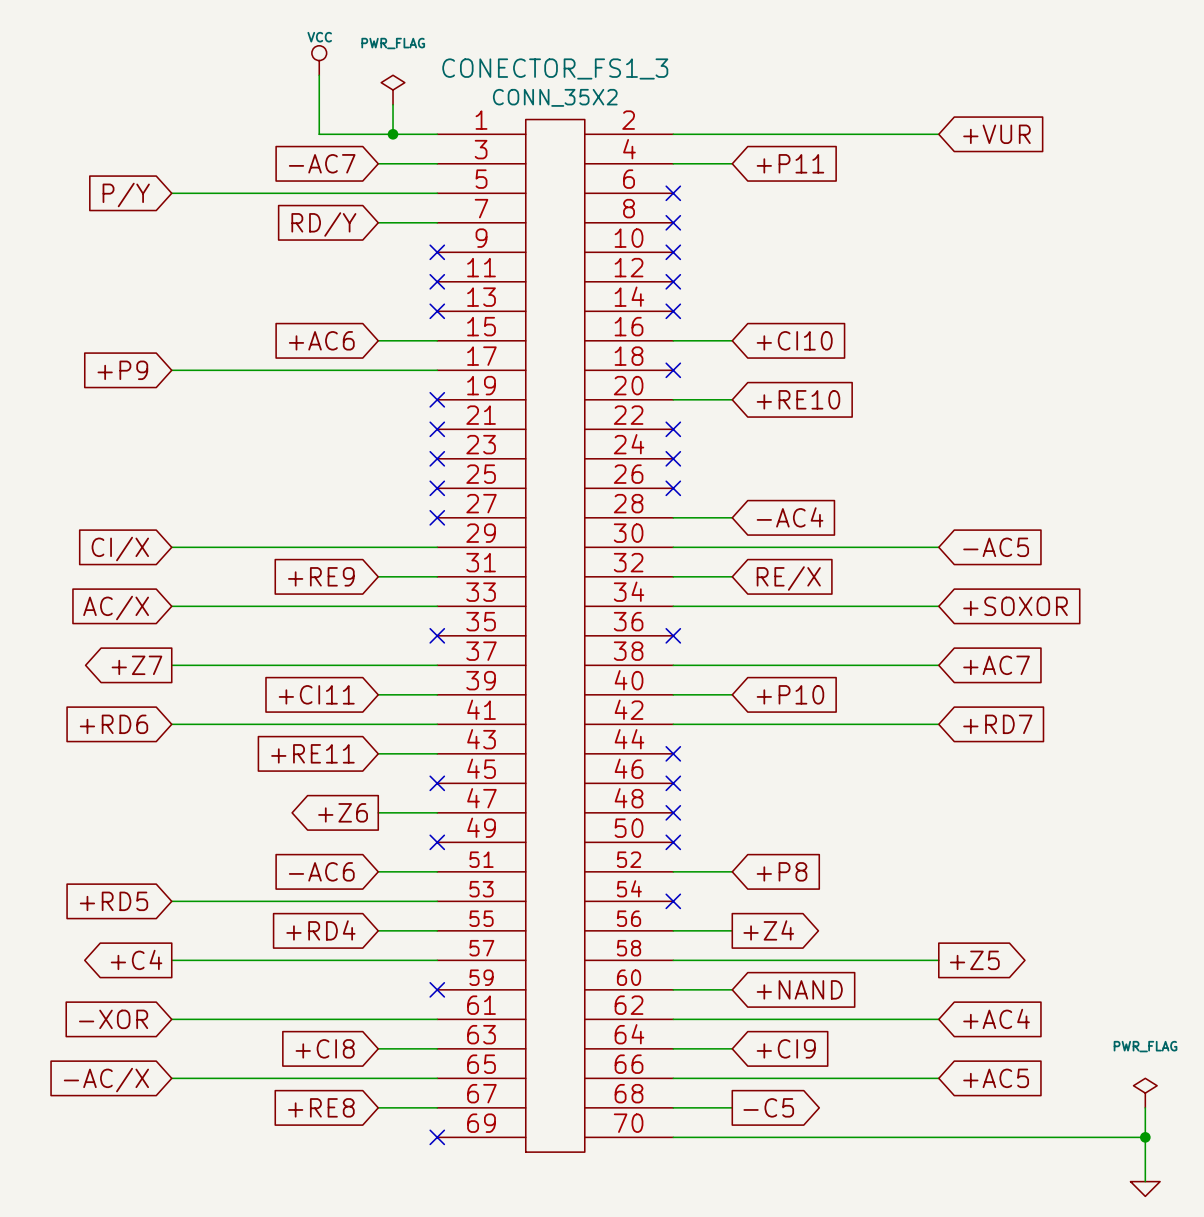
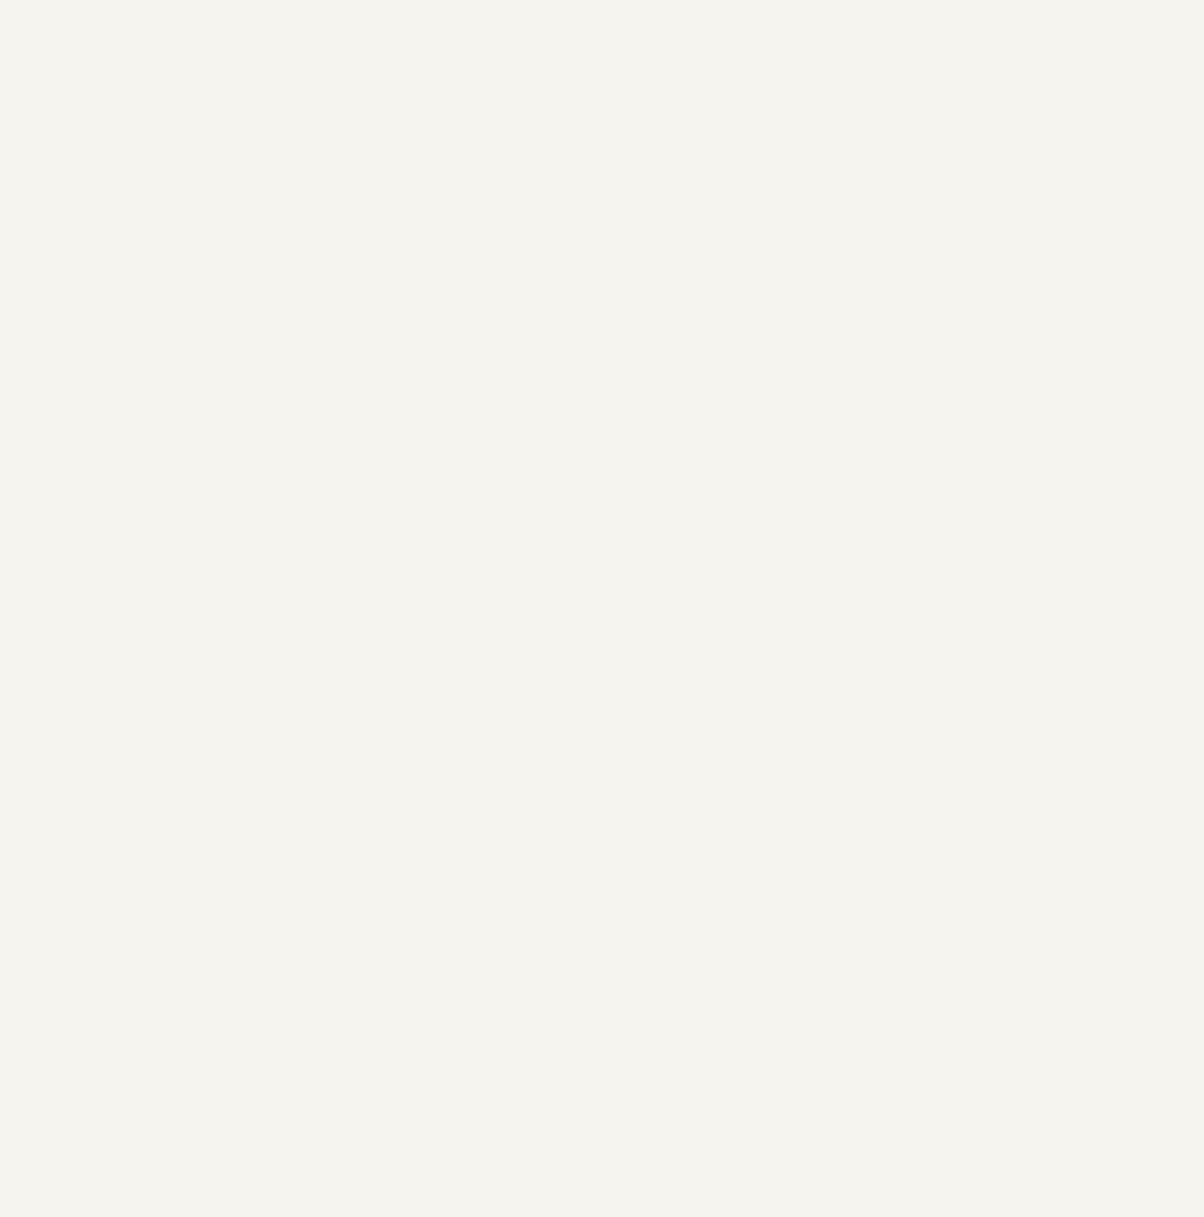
power symbol: VCC (319, 60) -> none
wire: (319, 75) (319, 134) (437, 134) -> none
power symbol: PWR_FLAG (393, 90) -> none
wire: (393, 104) (393, 134) -> none
junction: (393, 134) -> none
wire: (673, 134) (938, 134) -> none
global label: +VUR (996, 134) -> none
global label: -AC7 (322, 163) -> none
wire: (378, 163) (437, 163) -> none
wire: (673, 163) (732, 163) -> none
global label: +P11 (790, 163) -> none
wire: (171, 193) (437, 193) -> none
no-connect mark: (673, 193) -> none
global label: P/Y (126, 194) -> none
wire: (378, 222) (437, 222) -> none
no-connect mark: (673, 222) -> none
global label: RD/Y (323, 224) -> none
no-connect mark: (437, 252) -> none
no-connect mark: (673, 252) -> none
no-connect mark: (437, 281) -> none
no-connect mark: (673, 281) -> none
no-connect mark: (437, 311) -> none
no-connect mark: (673, 311) -> none
global label: +AC6 (321, 340) -> none
wire: (378, 340) (437, 340) -> none
wire: (673, 340) (732, 340) -> none
global label: +CI10 (794, 340) -> none
global label: +P9 (122, 370) -> none
wire: (171, 370) (437, 370) -> none
no-connect mark: (673, 370) -> none
no-connect mark: (437, 399) -> none
wire: (673, 399) (732, 399) -> none
global label: +RE10 (798, 399) -> none
no-connect mark: (437, 429) -> none
no-connect mark: (673, 429) -> none
no-connect mark: (437, 458) -> none
no-connect mark: (673, 458) -> none
no-connect mark: (437, 488) -> none
no-connect mark: (673, 488) -> none
no-connect mark: (437, 517) -> none
wire: (673, 517) (732, 517) -> none
global label: -AC4 (790, 517) -> none
wire: (171, 547) (437, 547) -> none
wire: (673, 547) (938, 547) -> none
global label: -AC5 (996, 547) -> none
global label: CI/X (120, 549) -> none
global label: +RE9 (321, 576) -> none
wire: (378, 576) (437, 576) -> none
wire: (673, 576) (732, 576) -> none
global label: RE/X (788, 578) -> none
wire: (171, 606) (437, 606) -> none
wire: (673, 606) (938, 606) -> none
global label: +SOXOR (1015, 606) -> none
global label: AC/X (116, 608) -> none
no-connect mark: (437, 635) -> none
CONECTOR_FS1_3: CONN_35X2 (555, 635) -> none
no-connect mark: (673, 635) -> none
global label: +Z7 (136, 665) -> none
wire: (171, 665) (437, 665) -> none
wire: (673, 665) (938, 665) -> none
global label: +AC7 (996, 665) -> none
global label: +CI11 (316, 694) -> none
wire: (378, 694) (437, 694) -> none
wire: (673, 694) (732, 694) -> none
global label: +P10 (790, 694) -> none
global label: +RD6 (114, 724) -> none
wire: (171, 724) (437, 724) -> none
wire: (673, 724) (938, 724) -> none
global label: +RD7 (997, 724) -> none
global label: +RE11 (312, 753) -> none
wire: (378, 753) (437, 753) -> none
no-connect mark: (673, 753) -> none
no-connect mark: (437, 783) -> none
no-connect mark: (673, 783) -> none
global label: +Z6 (343, 812) -> none
wire: (378, 812) (437, 812) -> none
no-connect mark: (673, 812) -> none
no-connect mark: (437, 842) -> none
no-connect mark: (673, 842) -> none
global label: -AC6 (321, 871) -> none
wire: (378, 871) (437, 871) -> none
wire: (673, 871) (732, 871) -> none
global label: +P8 (782, 871) -> none
global label: +RD5 (114, 901) -> none
wire: (171, 901) (437, 901) -> none
no-connect mark: (673, 901) -> none
global label: +RD4 (320, 930) -> none
wire: (378, 930) (437, 930) -> none
wire: (673, 930) (732, 930) -> none
global label: +Z4 (768, 930) -> none
global label: +C4 (136, 959) -> none
wire: (171, 960) (437, 960) -> none
wire: (673, 960) (938, 960) -> none
global label: +Z5 (974, 960) -> none
no-connect mark: (437, 989) -> none
wire: (673, 989) (732, 989) -> none
global label: +NAND (799, 989) -> none
global label: +AC4 (996, 1018) -> none
global label: -XOR (113, 1019) -> none
wire: (171, 1019) (437, 1019) -> none
wire: (673, 1019) (938, 1019) -> none
global label: +CI8 (325, 1048) -> none
wire: (378, 1048) (437, 1048) -> none
wire: (673, 1048) (732, 1048) -> none
global label: +CI9 (786, 1048) -> none
wire: (171, 1078) (437, 1078) -> none
wire: (673, 1078) (938, 1078) -> none
global label: +AC5 (996, 1078) -> none
global label: -AC/X (106, 1080) -> none
power symbol: PWR_FLAG (1145, 1093) -> none
global label: +RE8 (321, 1107) -> none
wire: (378, 1107) (437, 1107) -> none
wire: (673, 1107) (732, 1107) -> none
global label: -C5 (768, 1107) -> none
wire: (1145, 1107) (1145, 1181) -> none
no-connect mark: (437, 1137) -> none
wire: (673, 1137) (1145, 1137) -> none
junction: (1145, 1137) -> none
power symbol: (1145, 1189) -> none

